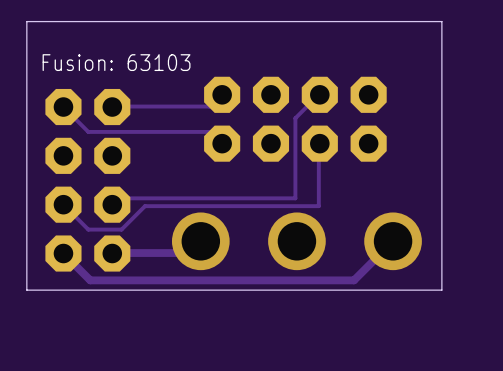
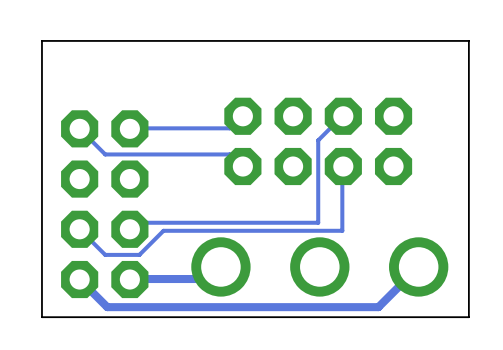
text: Fusion: 63103 (116, 62) -> none

